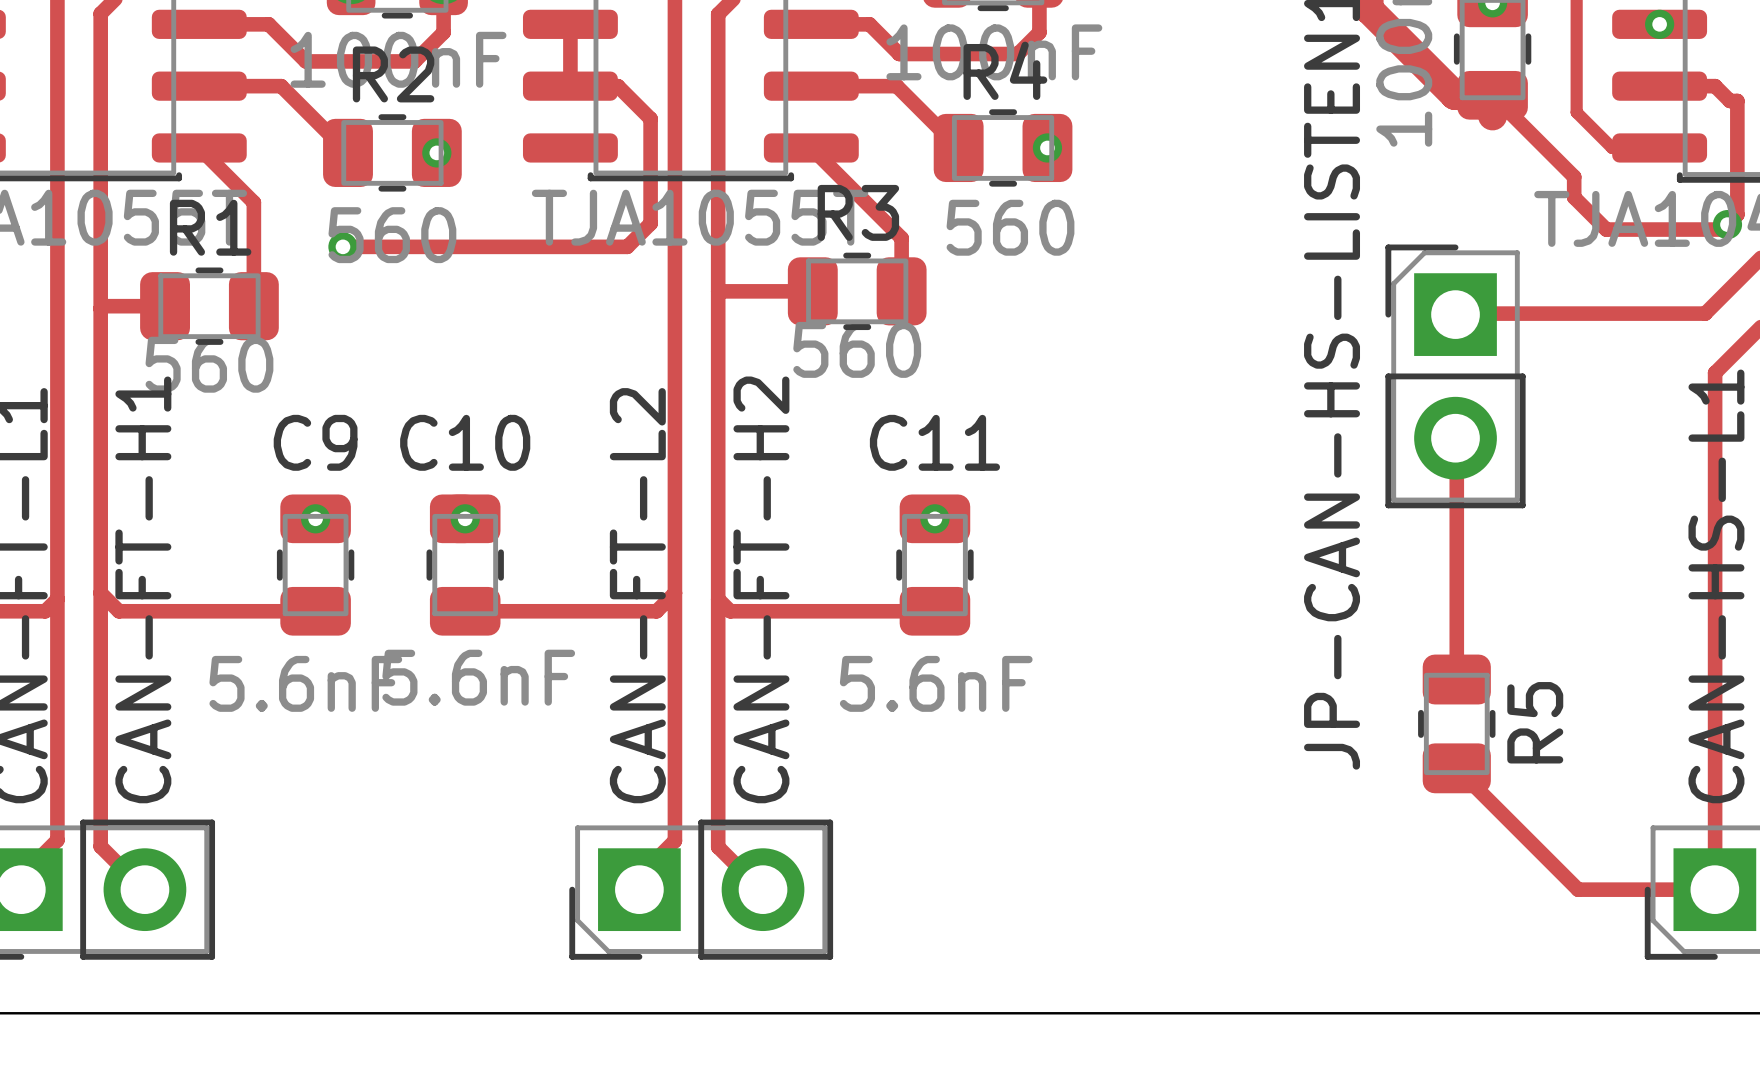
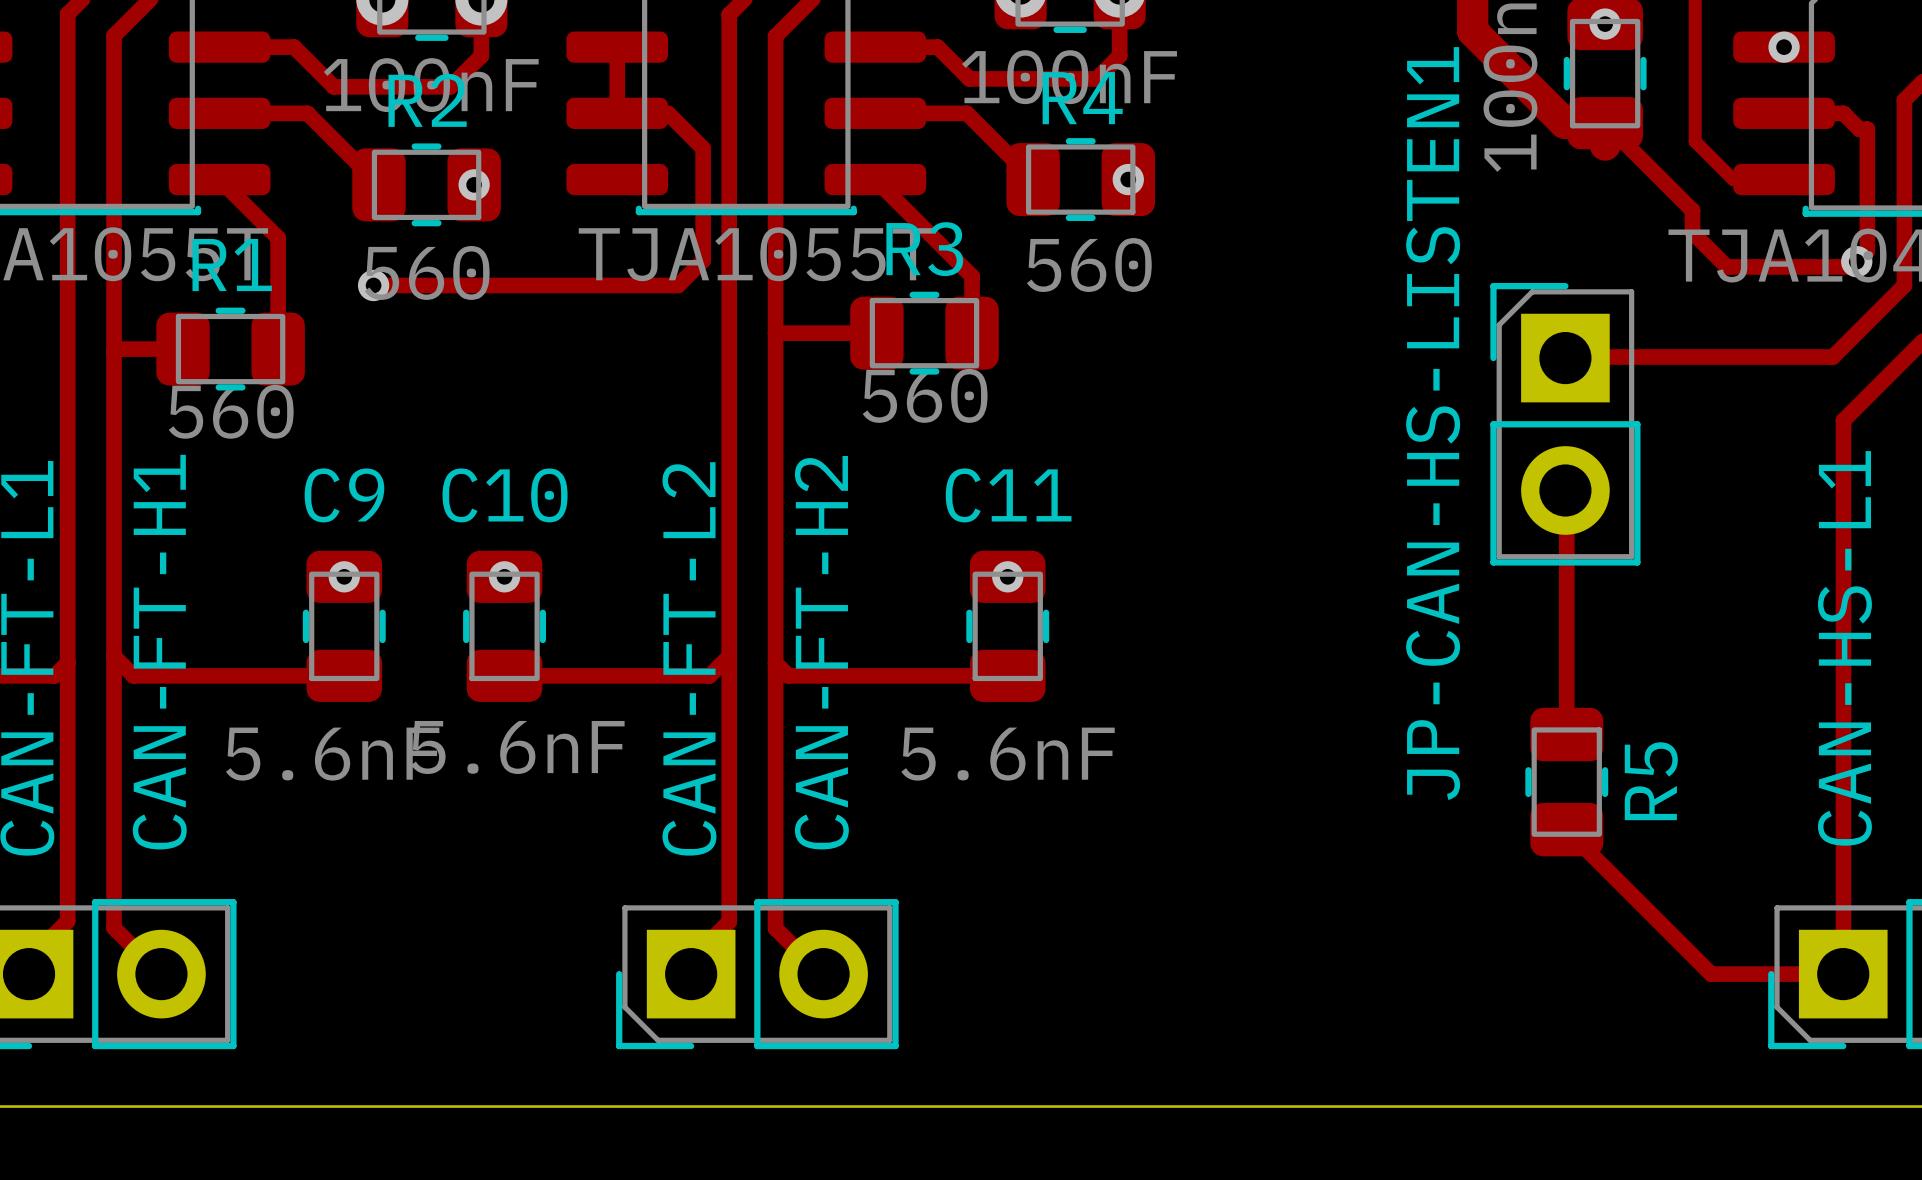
R5 position: (1456, 723) -> (1566, 782)
track: (1456, 768) (1578, 889) (1591, 889) -> (1581, 844) (1711, 974)

